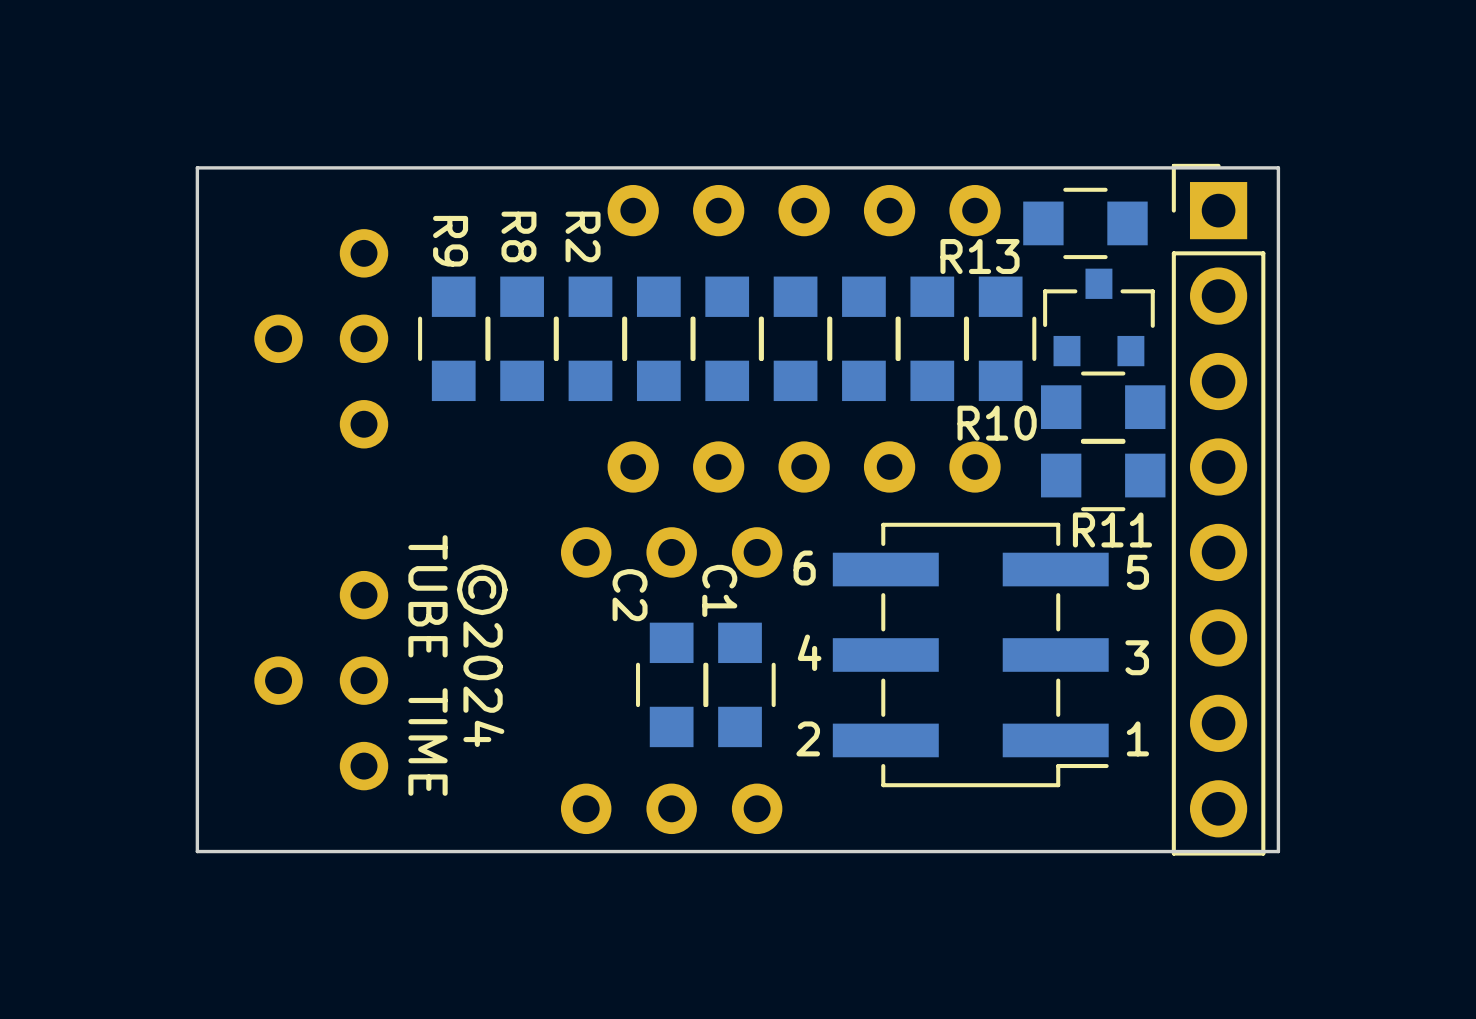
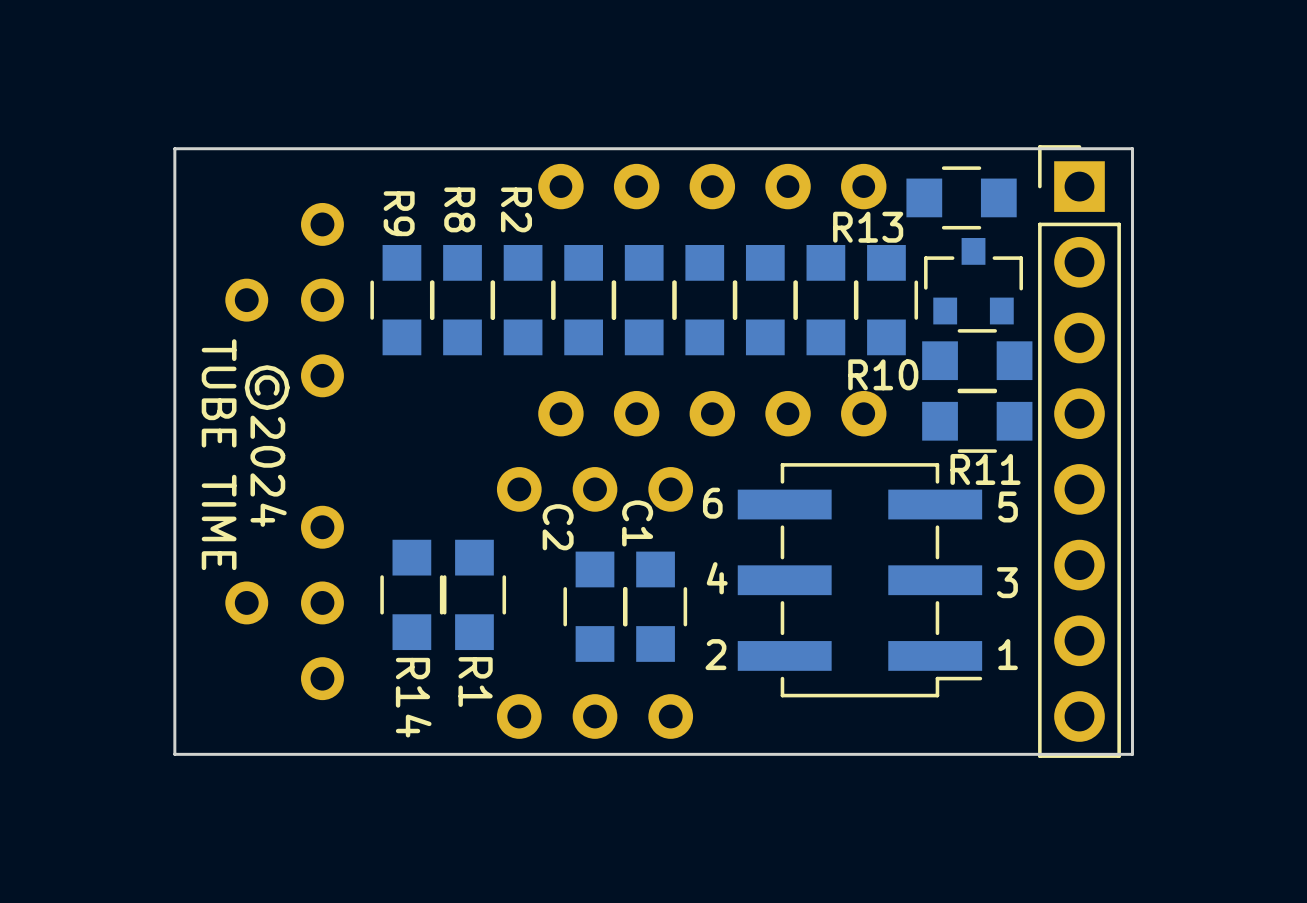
text position: ©2024 (482, 655) -> ©2024 (267, 446)
text position: TUBE TIME (428, 665) -> TUBE TIME (219, 454)
R14: none -> (411, 594)
R1: none -> (474, 594)

